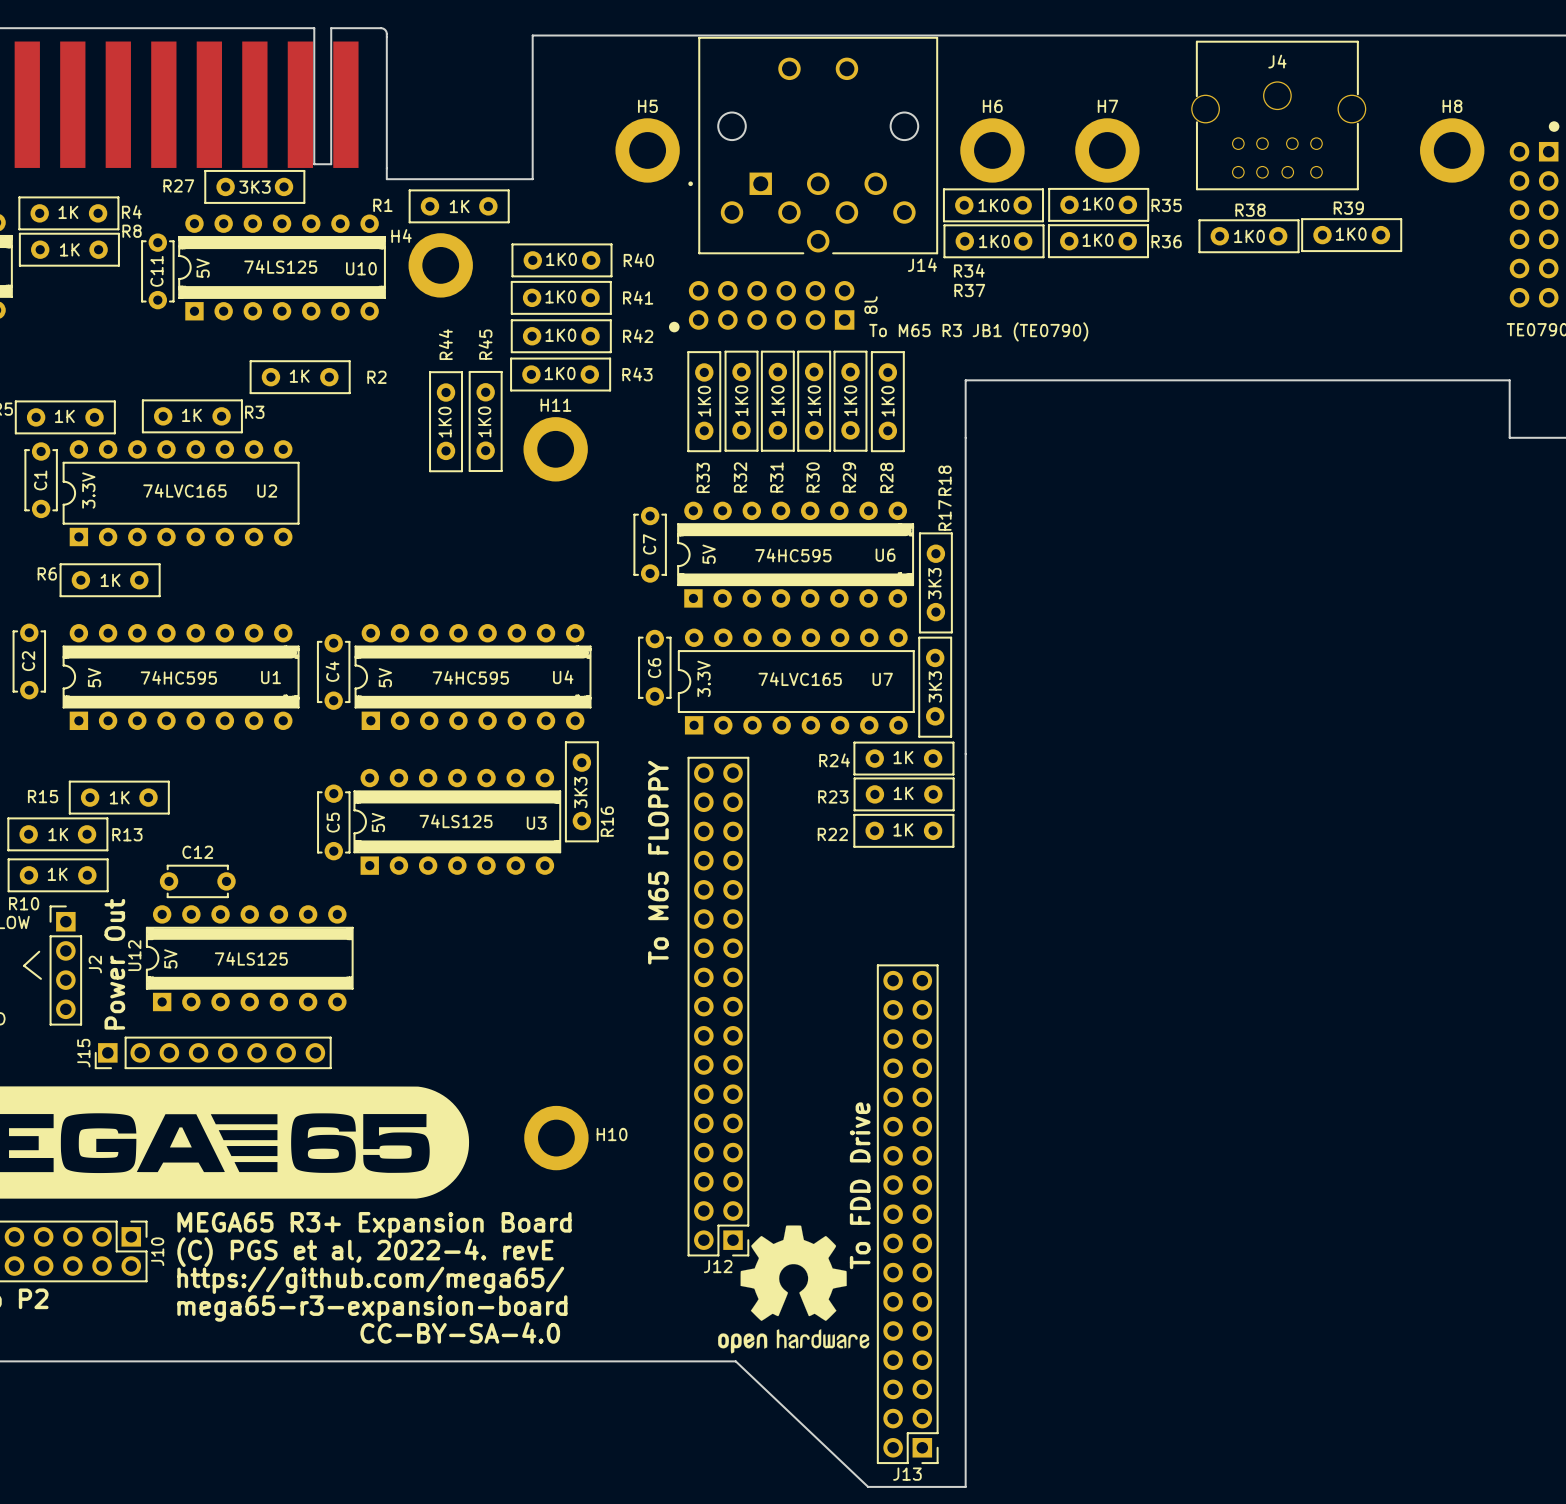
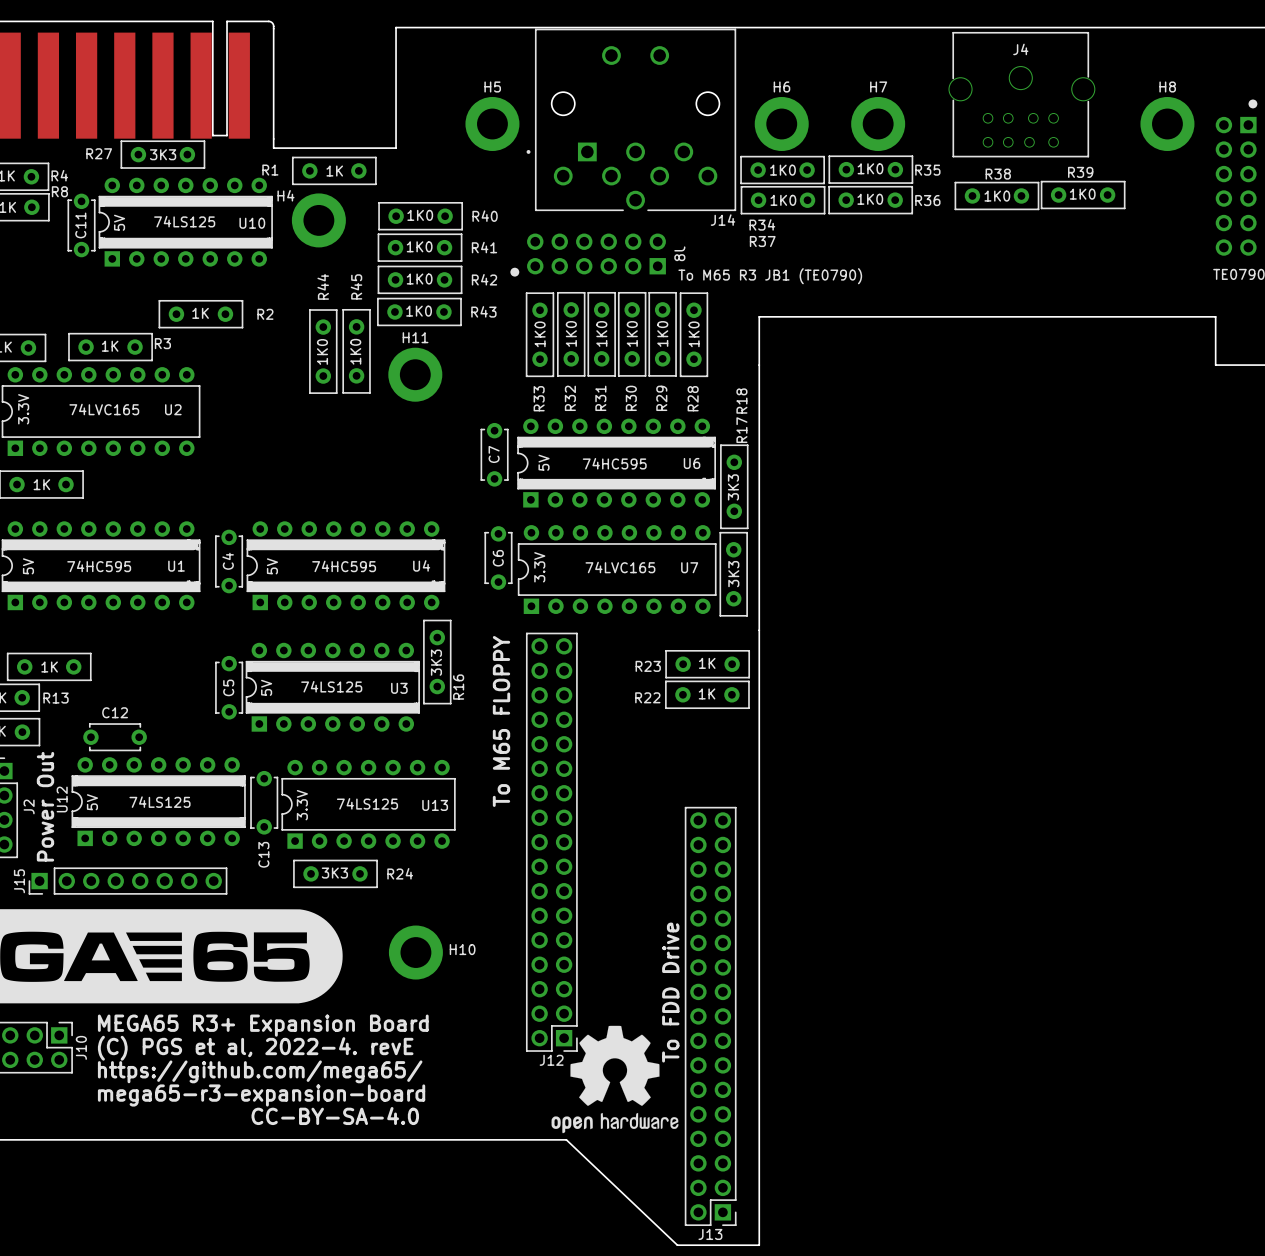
R24 value: 1K (903, 757) -> 3K3 (334, 873)
R24 position: (903, 758) -> (335, 873)
R24 name position: R24 (834, 760) -> R24 (400, 873)
C13: none -> (264, 802)
U13: none -> 74LS125 (368, 804)

